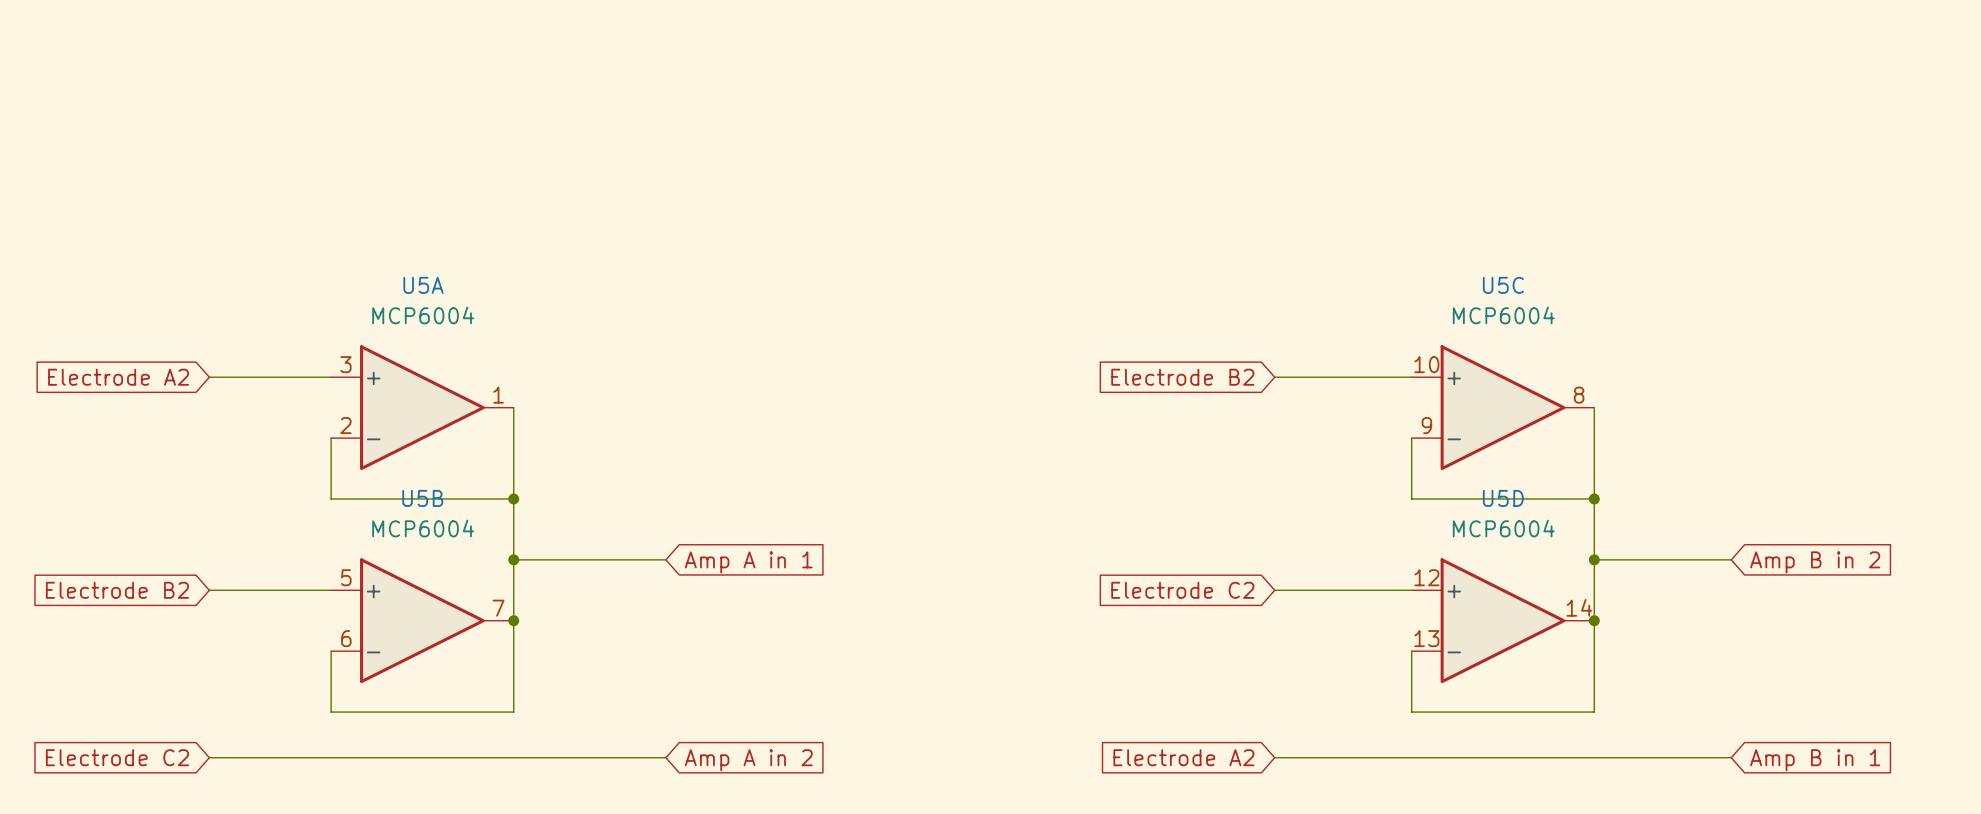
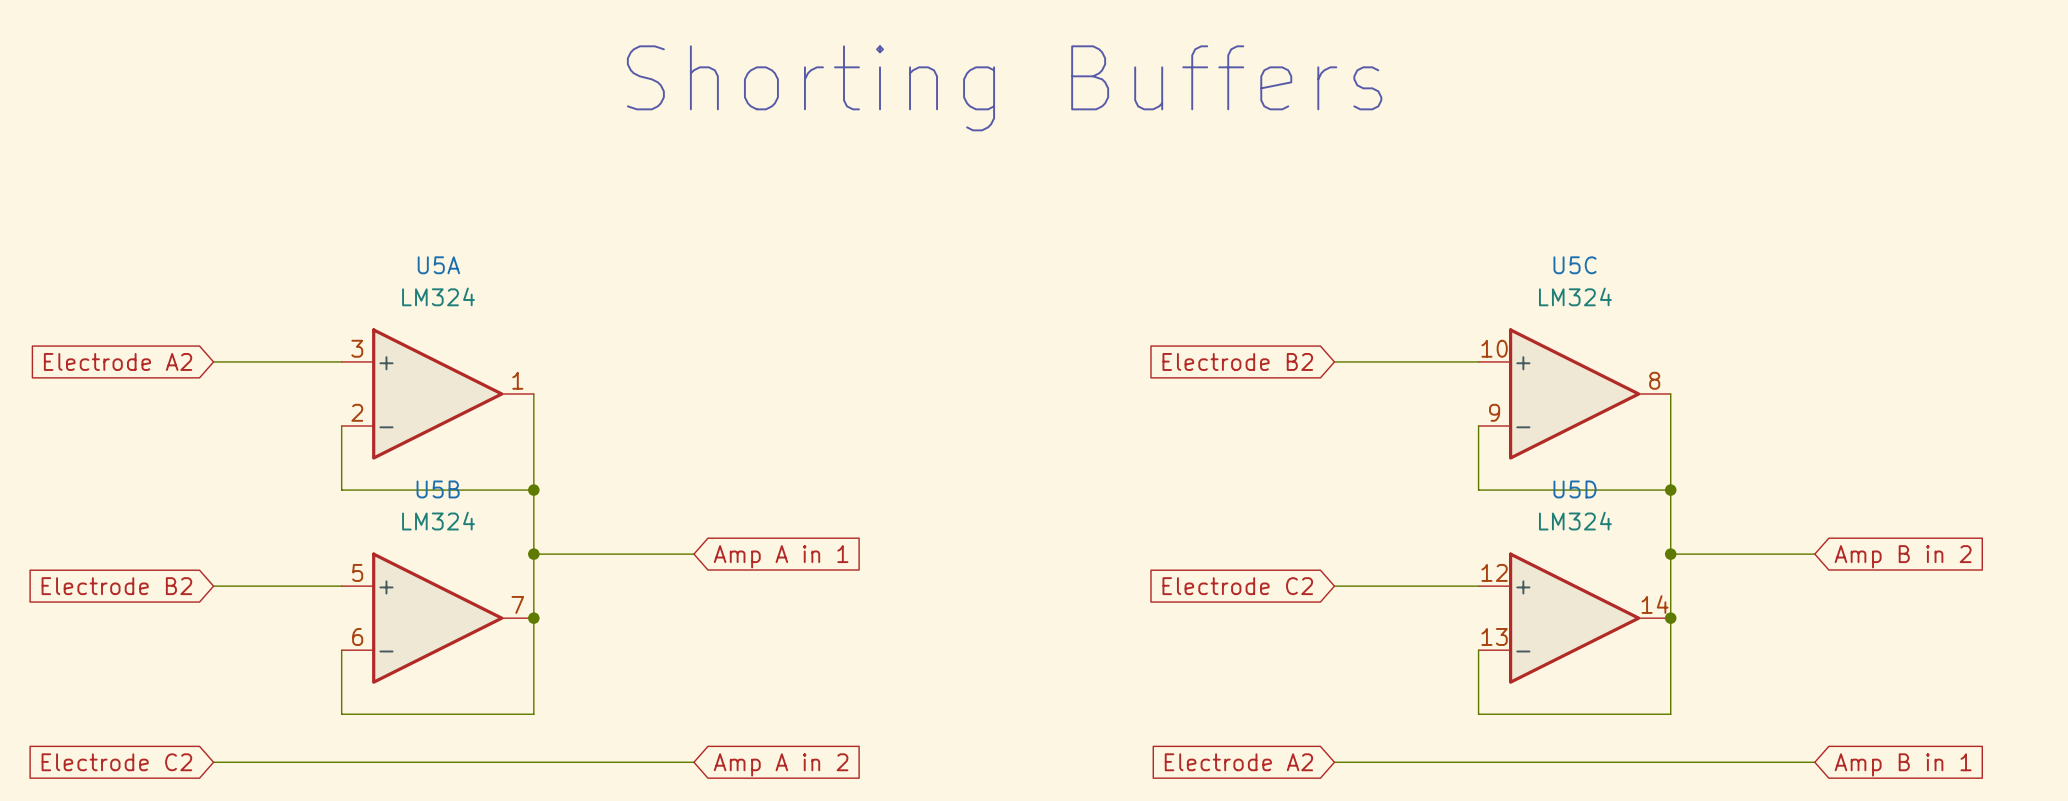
text: none -> Shorting Buffers (1004, 88)
U5A value: MCP6004 (423, 315) -> LM324 (438, 296)
U5C value: MCP6004 (1503, 315) -> LM324 (1575, 296)
U5B value: MCP6004 (423, 528) -> LM324 (438, 521)
U5D value: MCP6004 (1503, 528) -> LM324 (1575, 521)

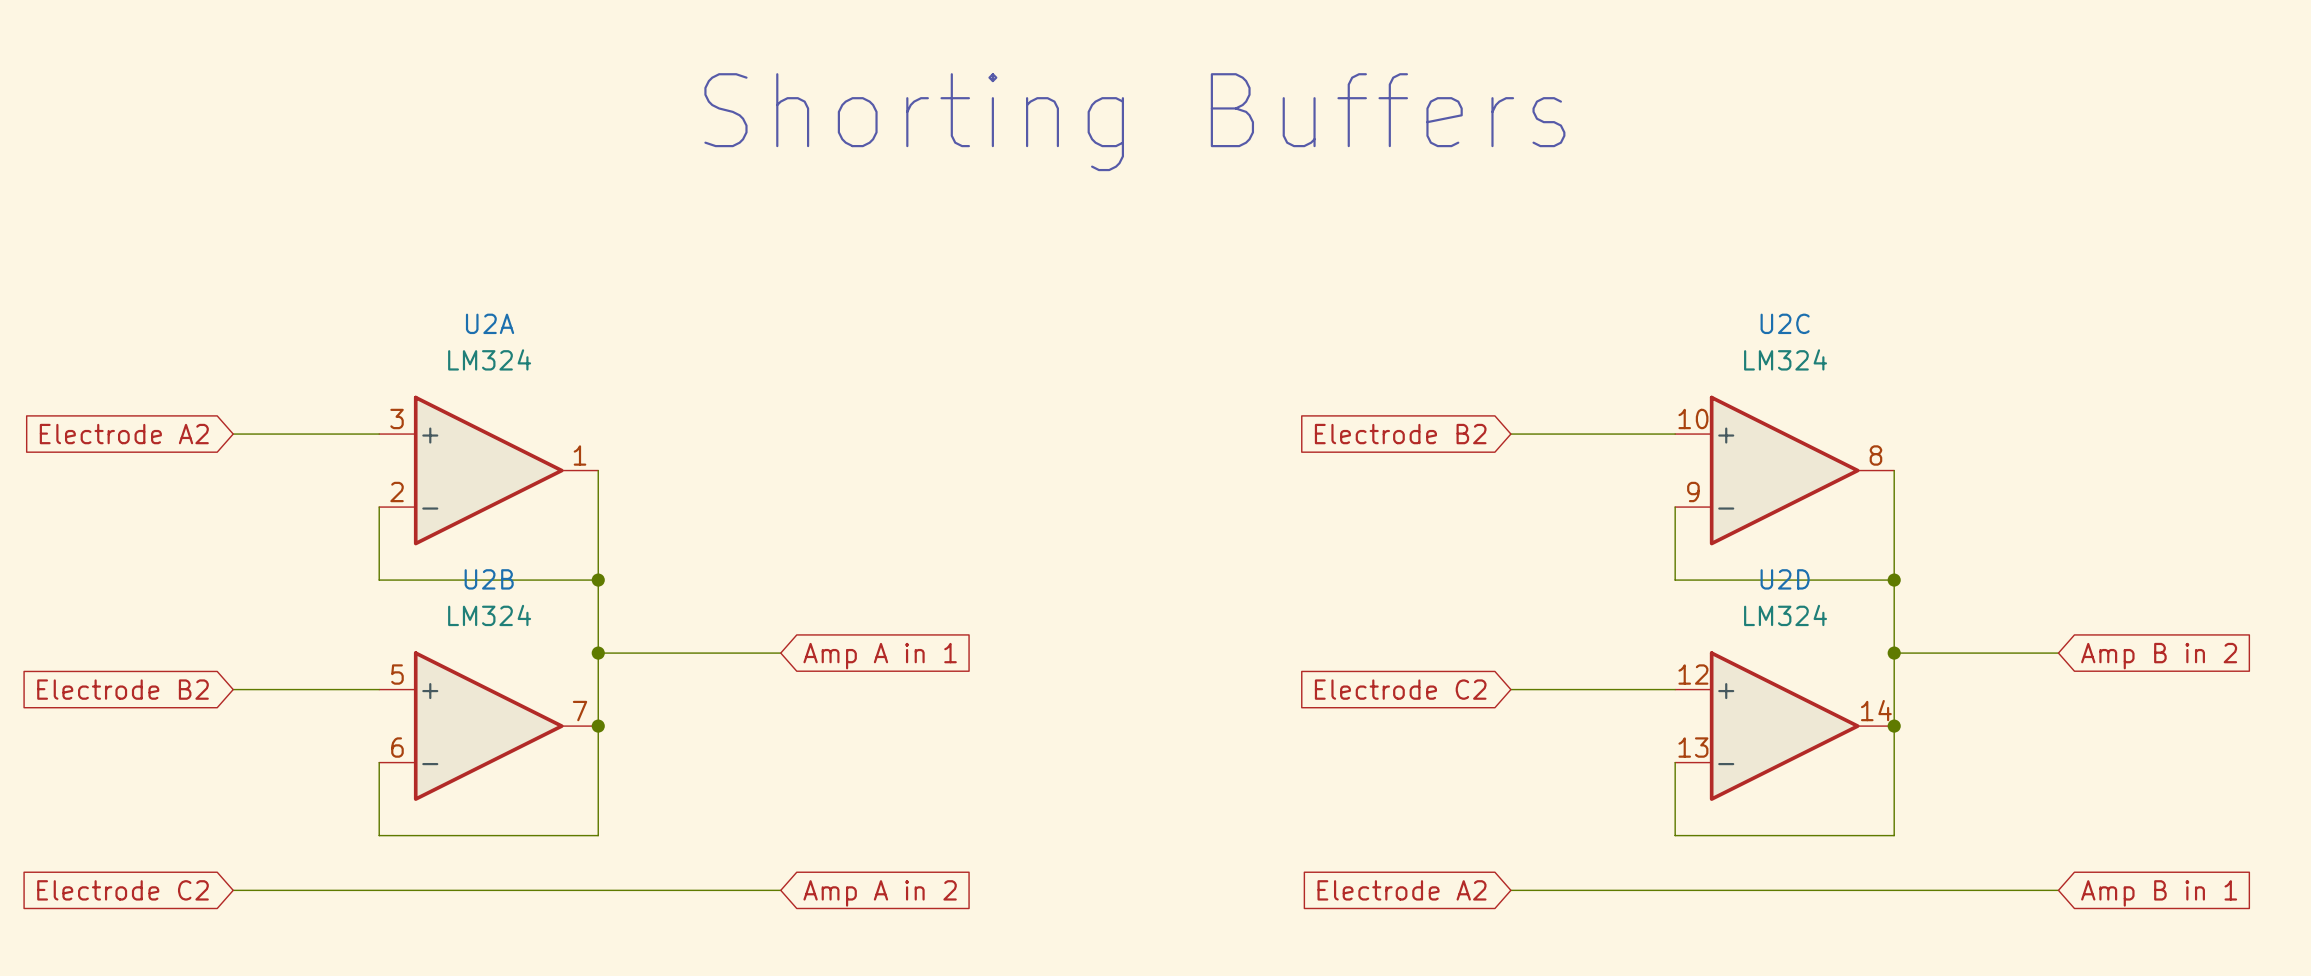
U5A name: U5A (438, 265) -> U2A (490, 323)
U5C name: U5C (1575, 265) -> U2C (1785, 323)
U5B name: U5B (438, 489) -> U2B (489, 579)
U5D name: U5D (1575, 489) -> U2D (1785, 579)

